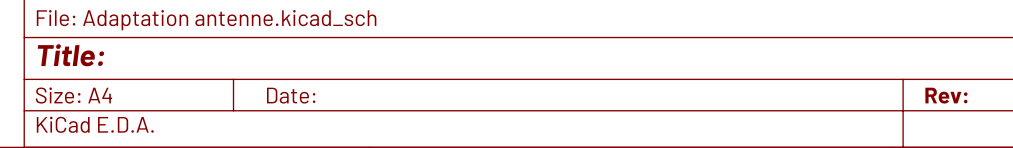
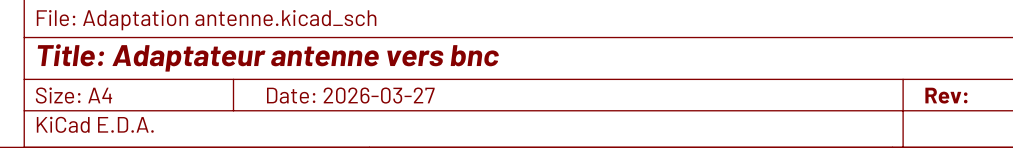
title block: Title: (70, 55) -> Title: Adaptateur antenne vers bnc (268, 57)
title block: Date: (291, 95) -> Date: 2026-03-27 (350, 95)

